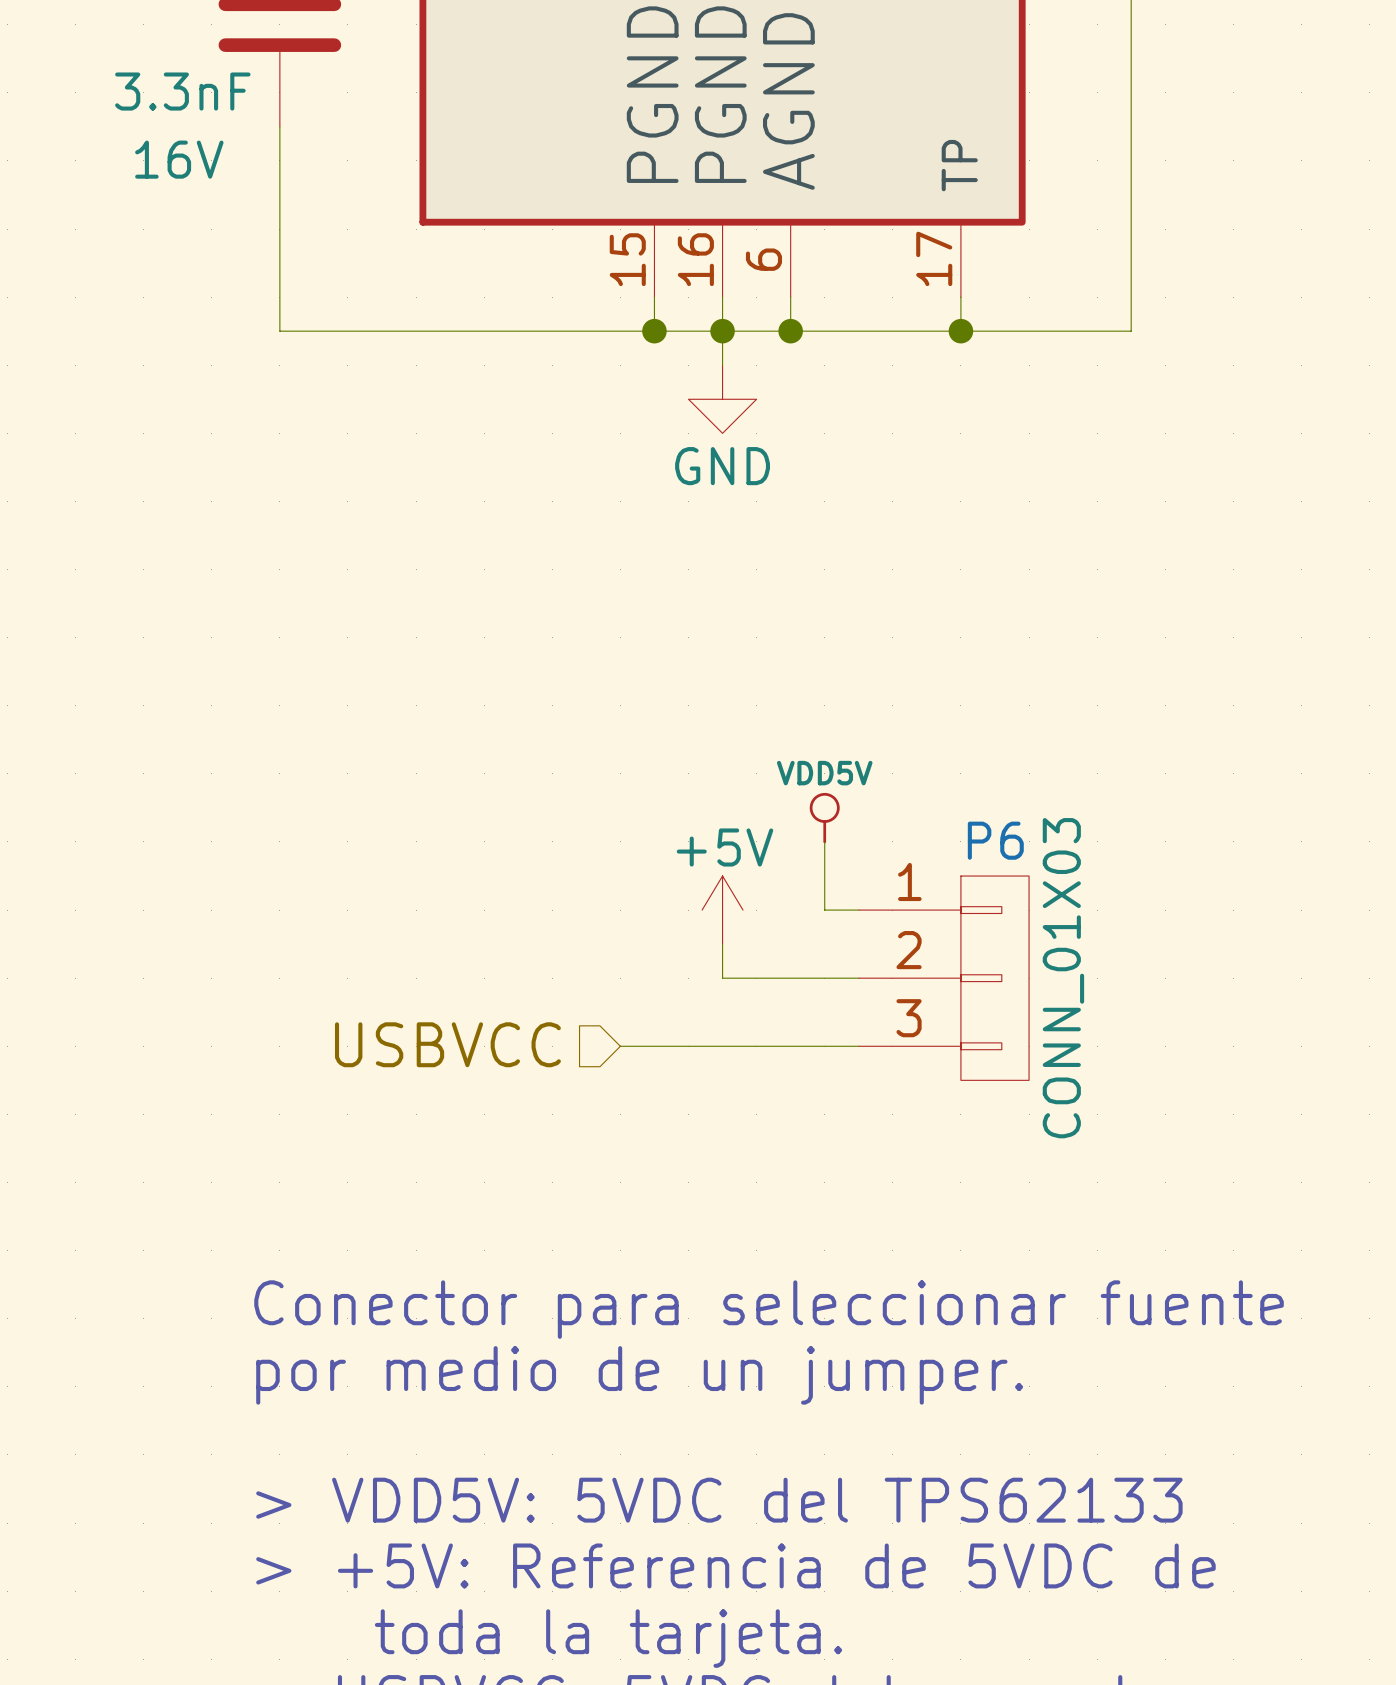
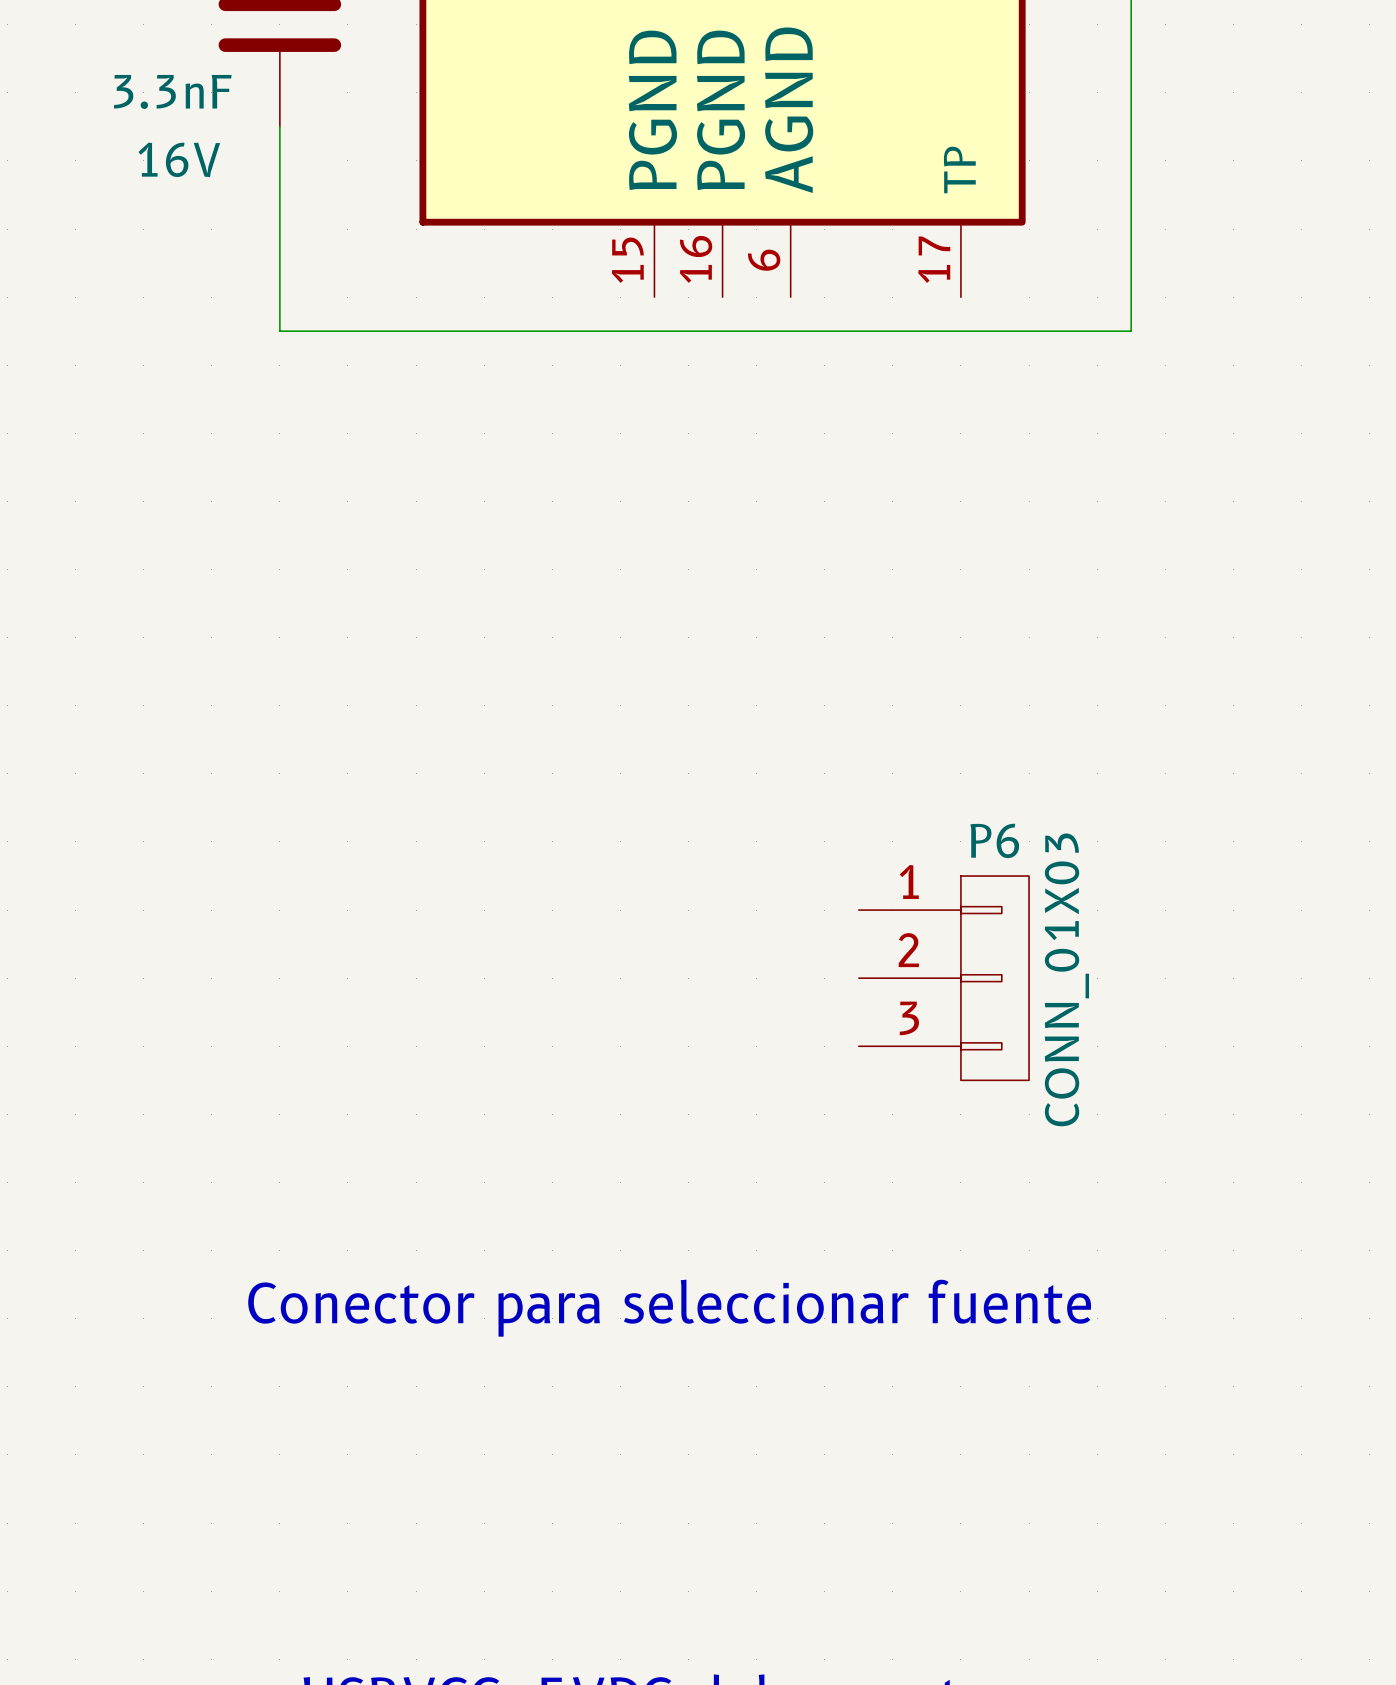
wire: (654, 297) (654, 331) -> none
wire: (722, 297) (722, 365) -> none
wire: (790, 297) (790, 331) -> none
wire: (960, 297) (960, 331) -> none
junction: (654, 331) -> none
junction: (722, 331) -> none
junction: (790, 331) -> none
junction: (960, 331) -> none
power symbol: GND (722, 399) -> none
power symbol: VDD5V (824, 818) -> none
wire: (824, 841) (824, 910) (858, 910) -> none
power symbol: +5V (722, 910) -> none
wire: (722, 944) (722, 978) (858, 978) -> none
hierarchical label: USBVCC (447, 1044) -> none
wire: (620, 1046) (858, 1046) -> none
text: por medio de un jumper. (639, 1375) -> none
text: > VDD5V: 5VDC del TPS62133 (719, 1500) -> none
text: > +5V: Referencia de 5VDC de (735, 1565) -> none
text: toda la tarjeta. (608, 1638) -> none

